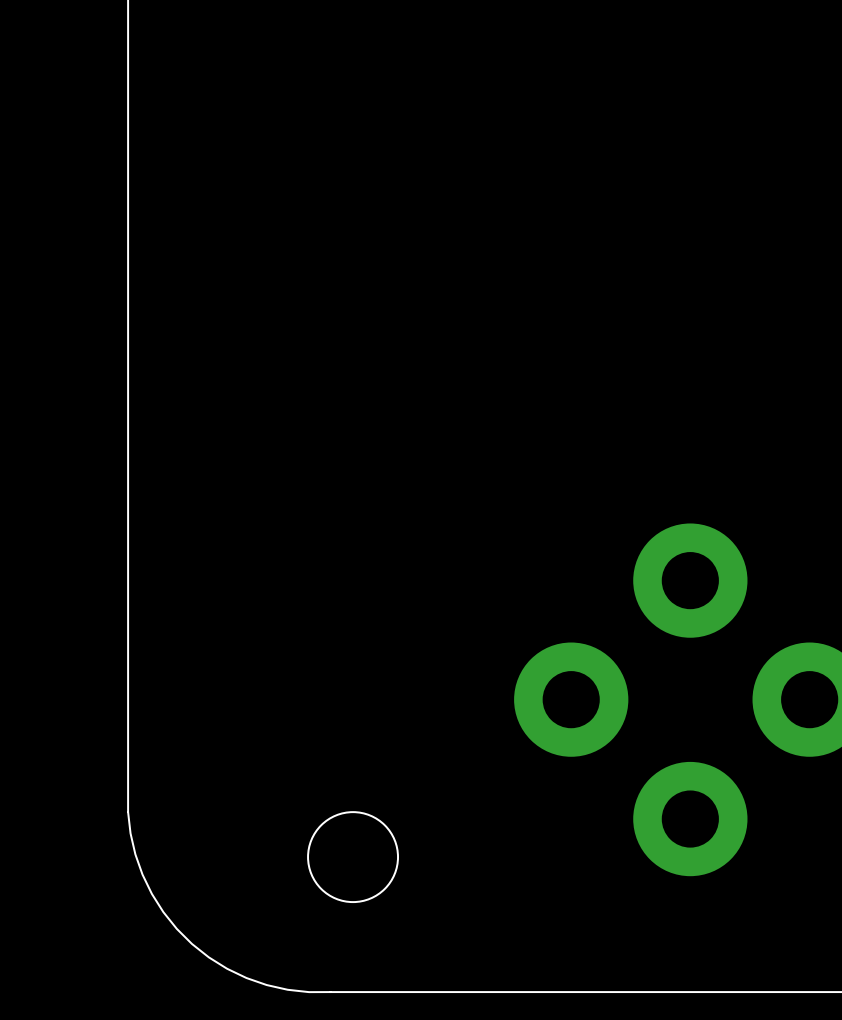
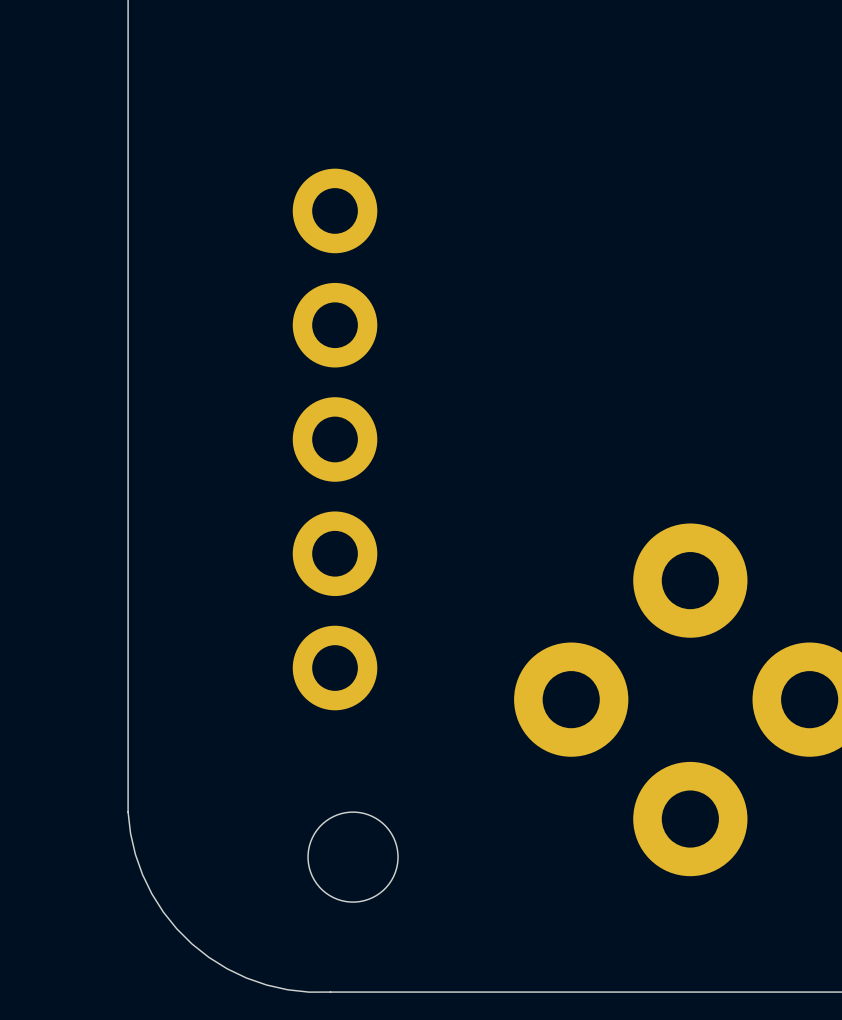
part: none -> (335, 439)

